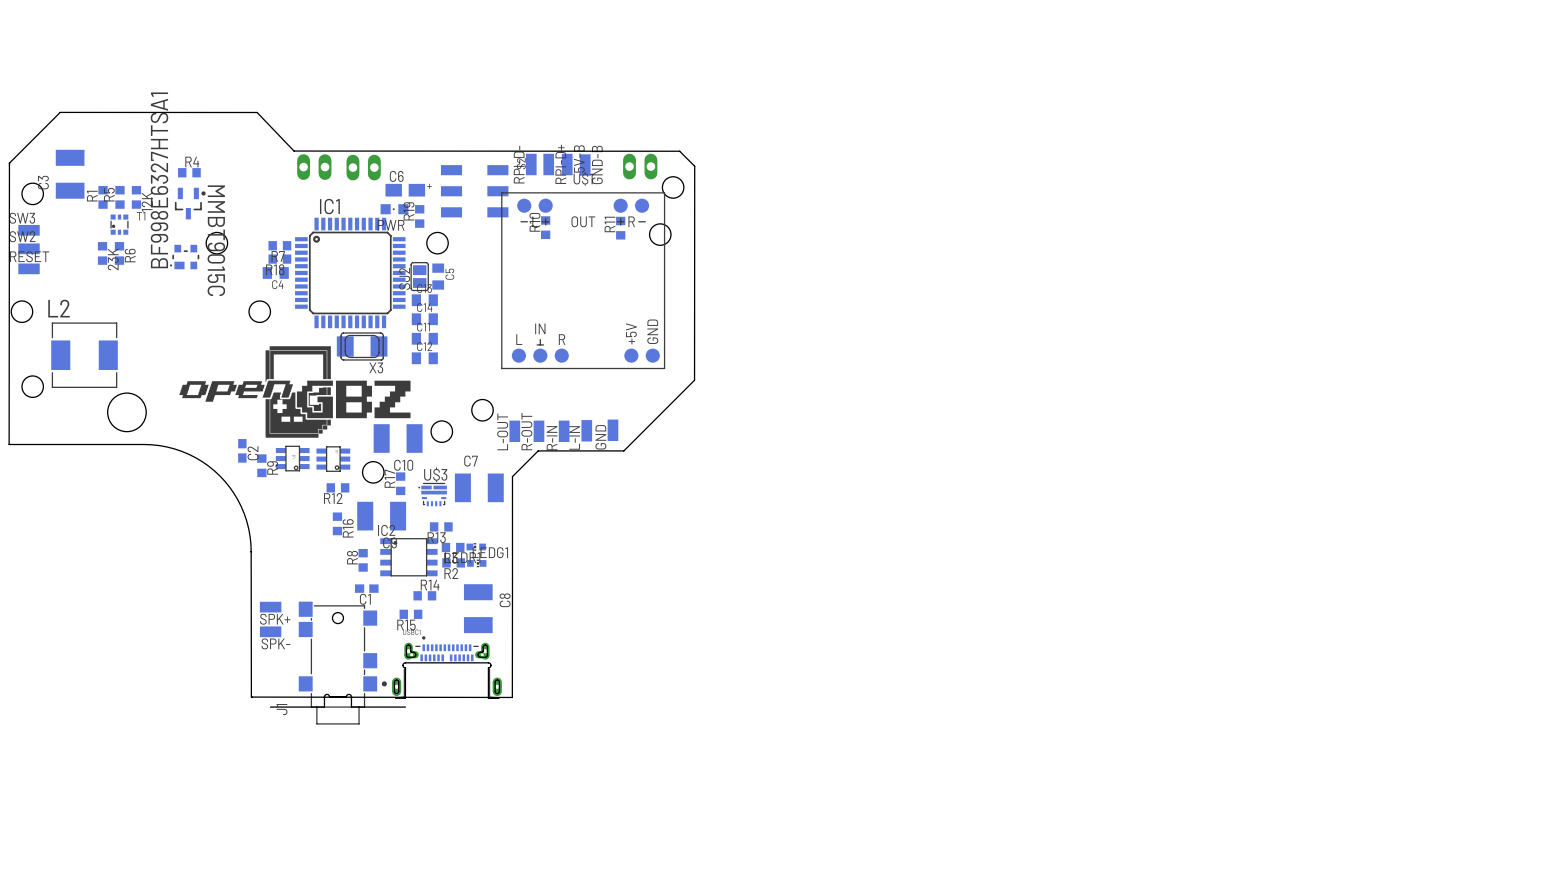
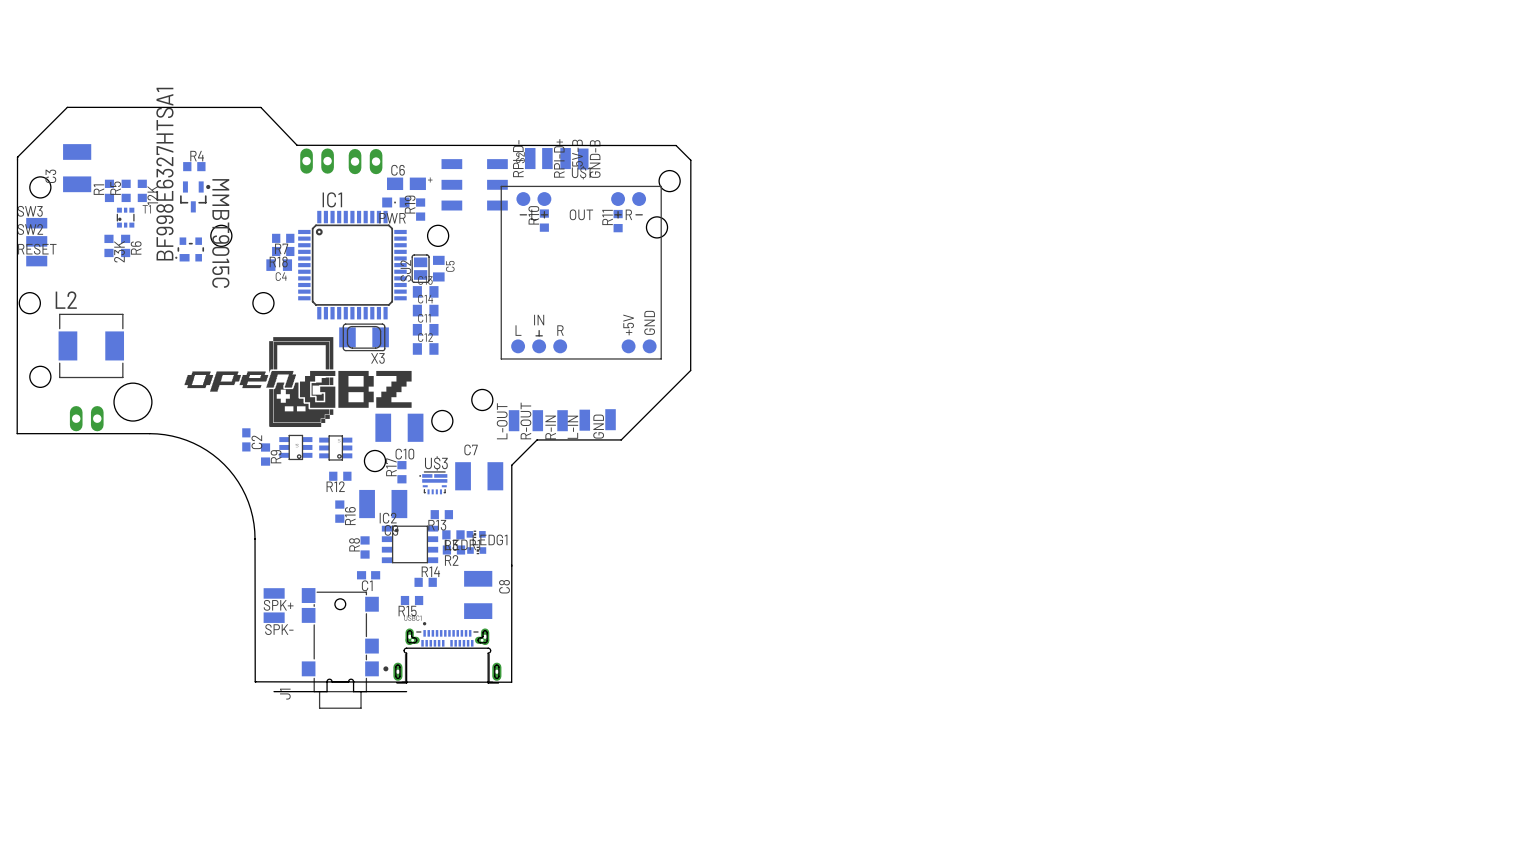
part: (640, 166) -> none
part: none -> (86, 418)

